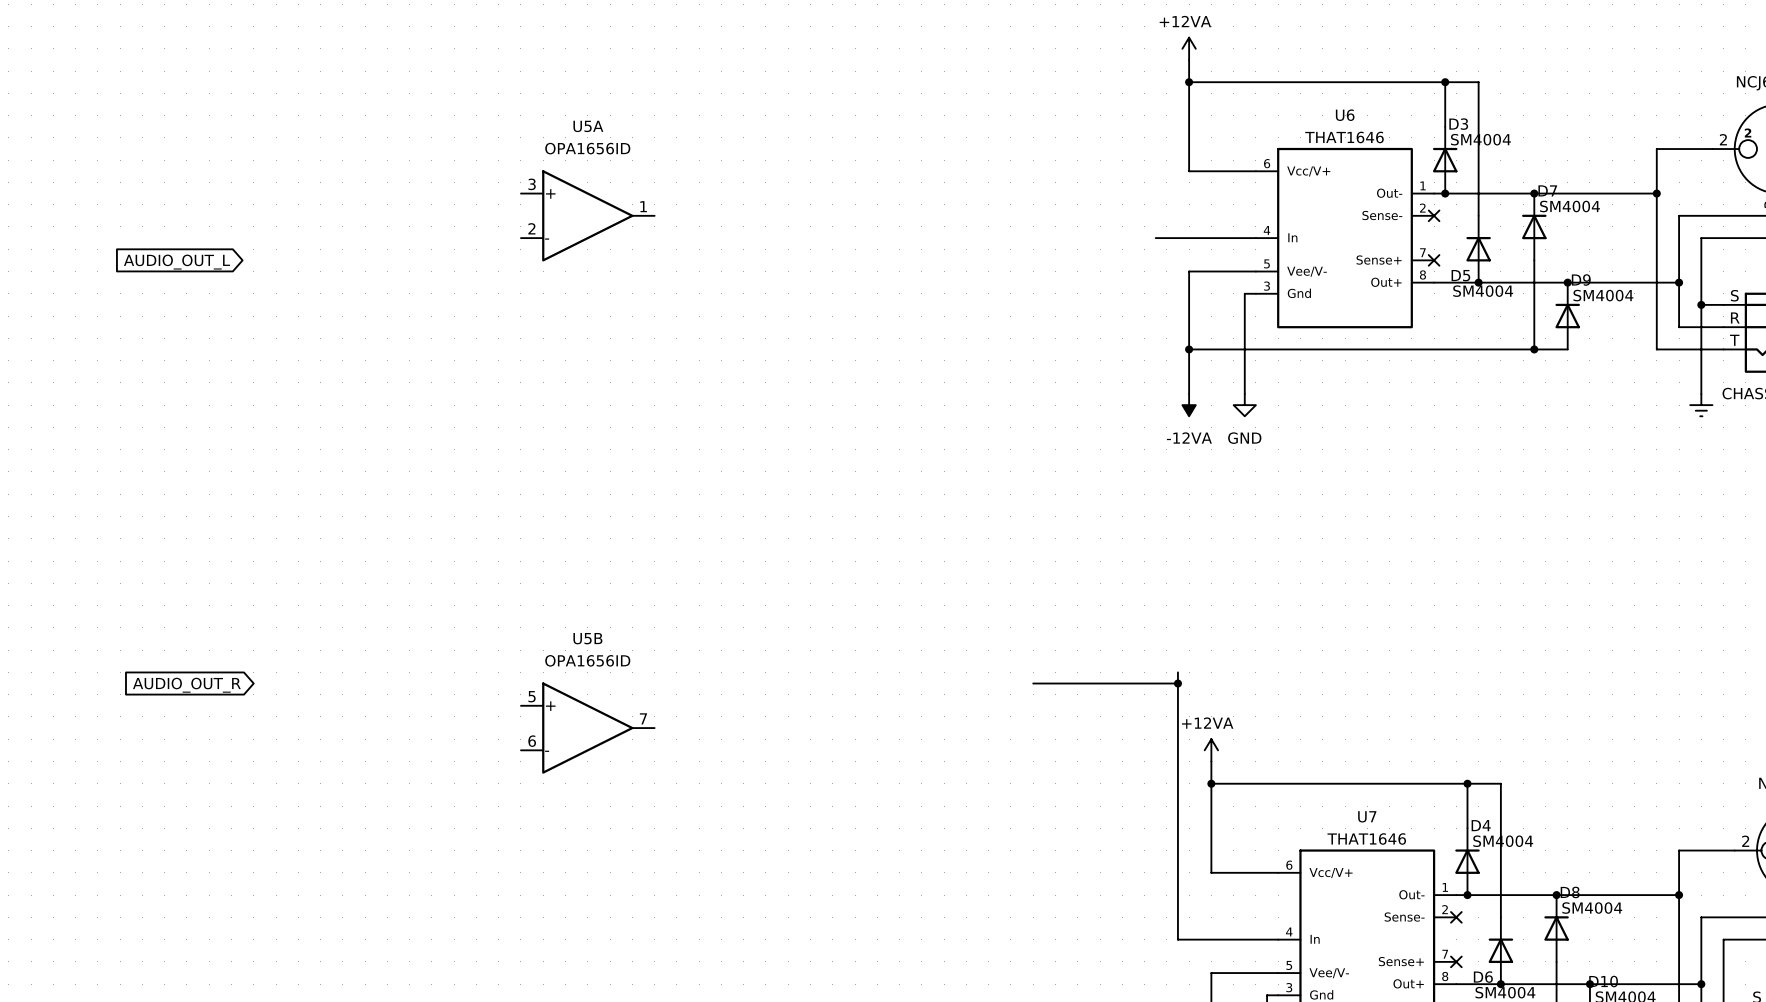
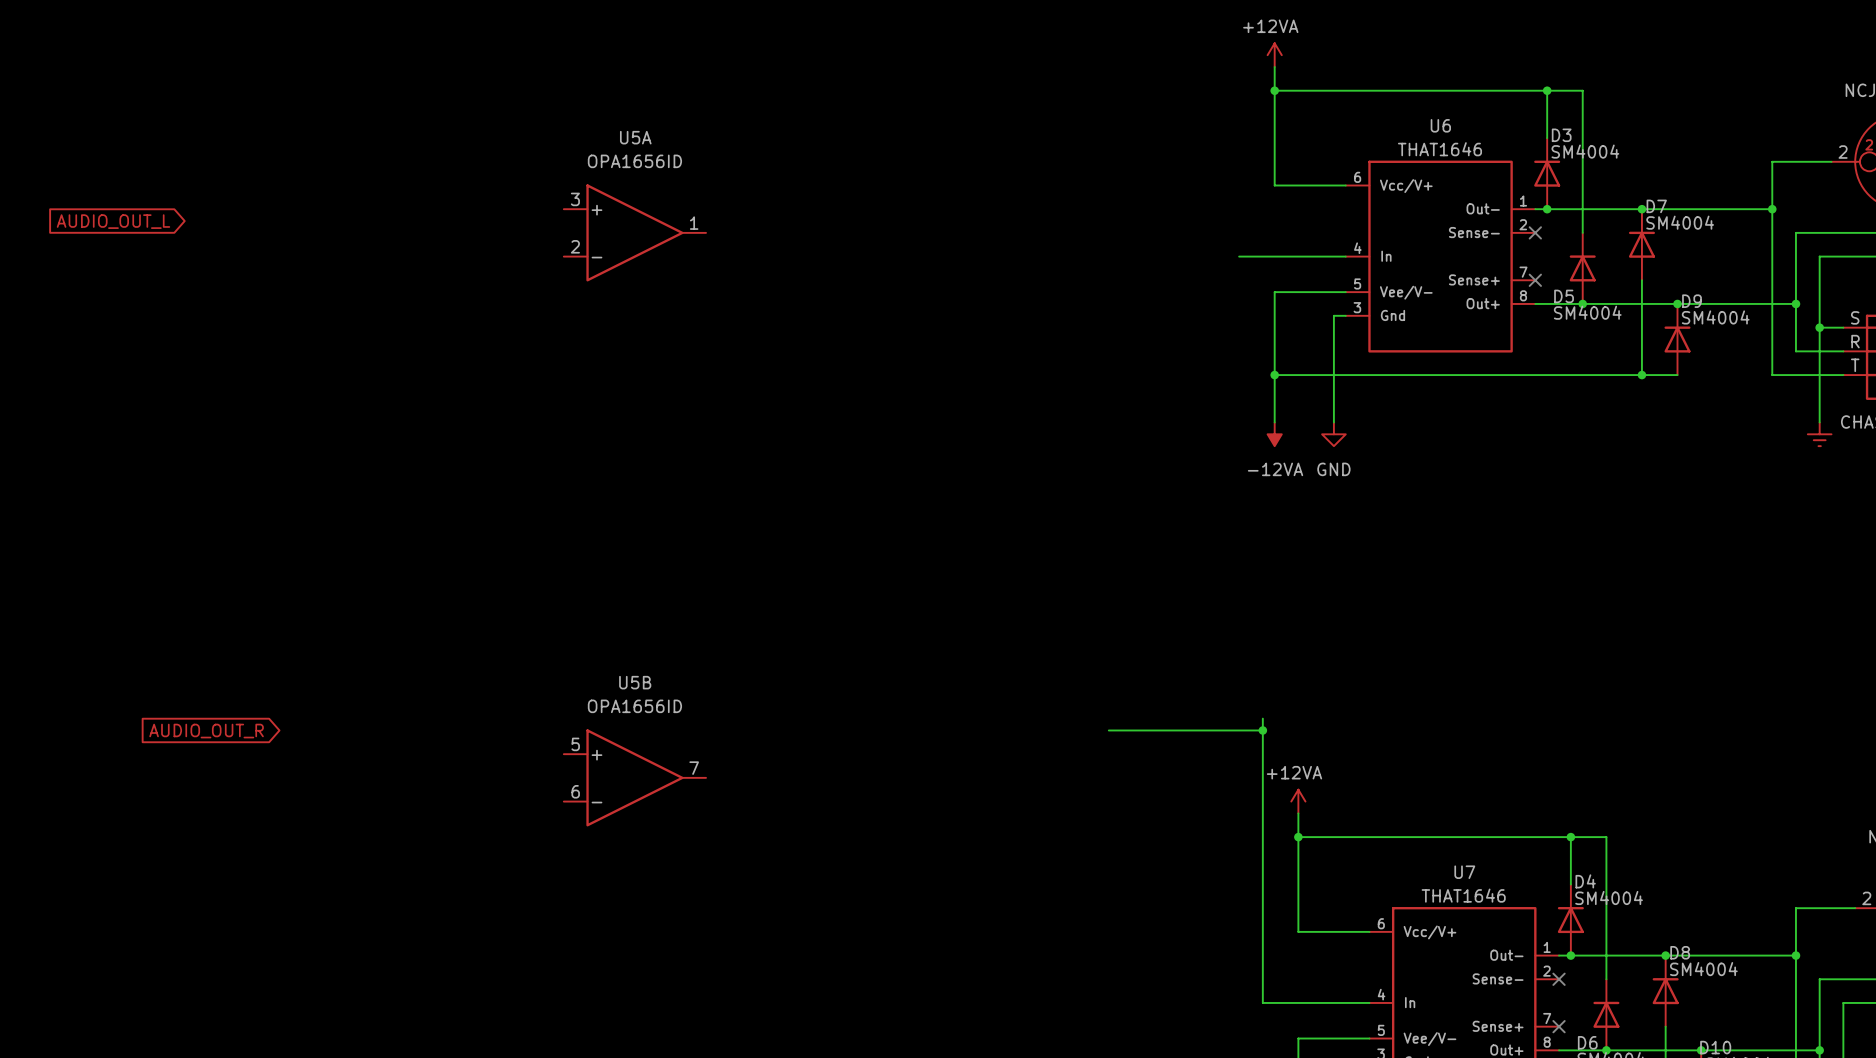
global label position: AUDIO_OUT_L (176, 262) -> AUDIO_OUT_L (113, 221)

